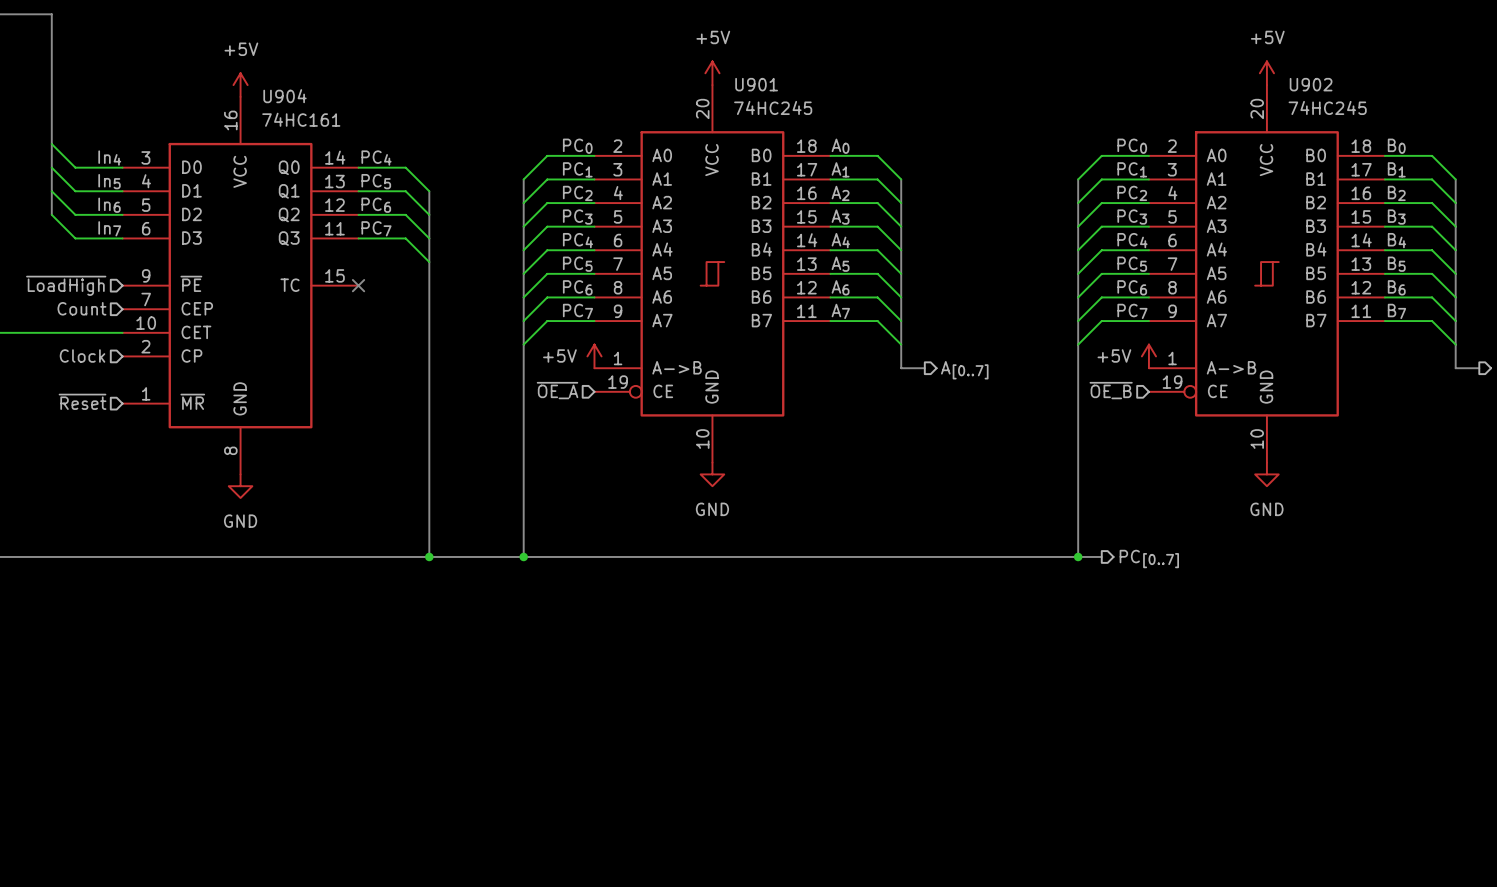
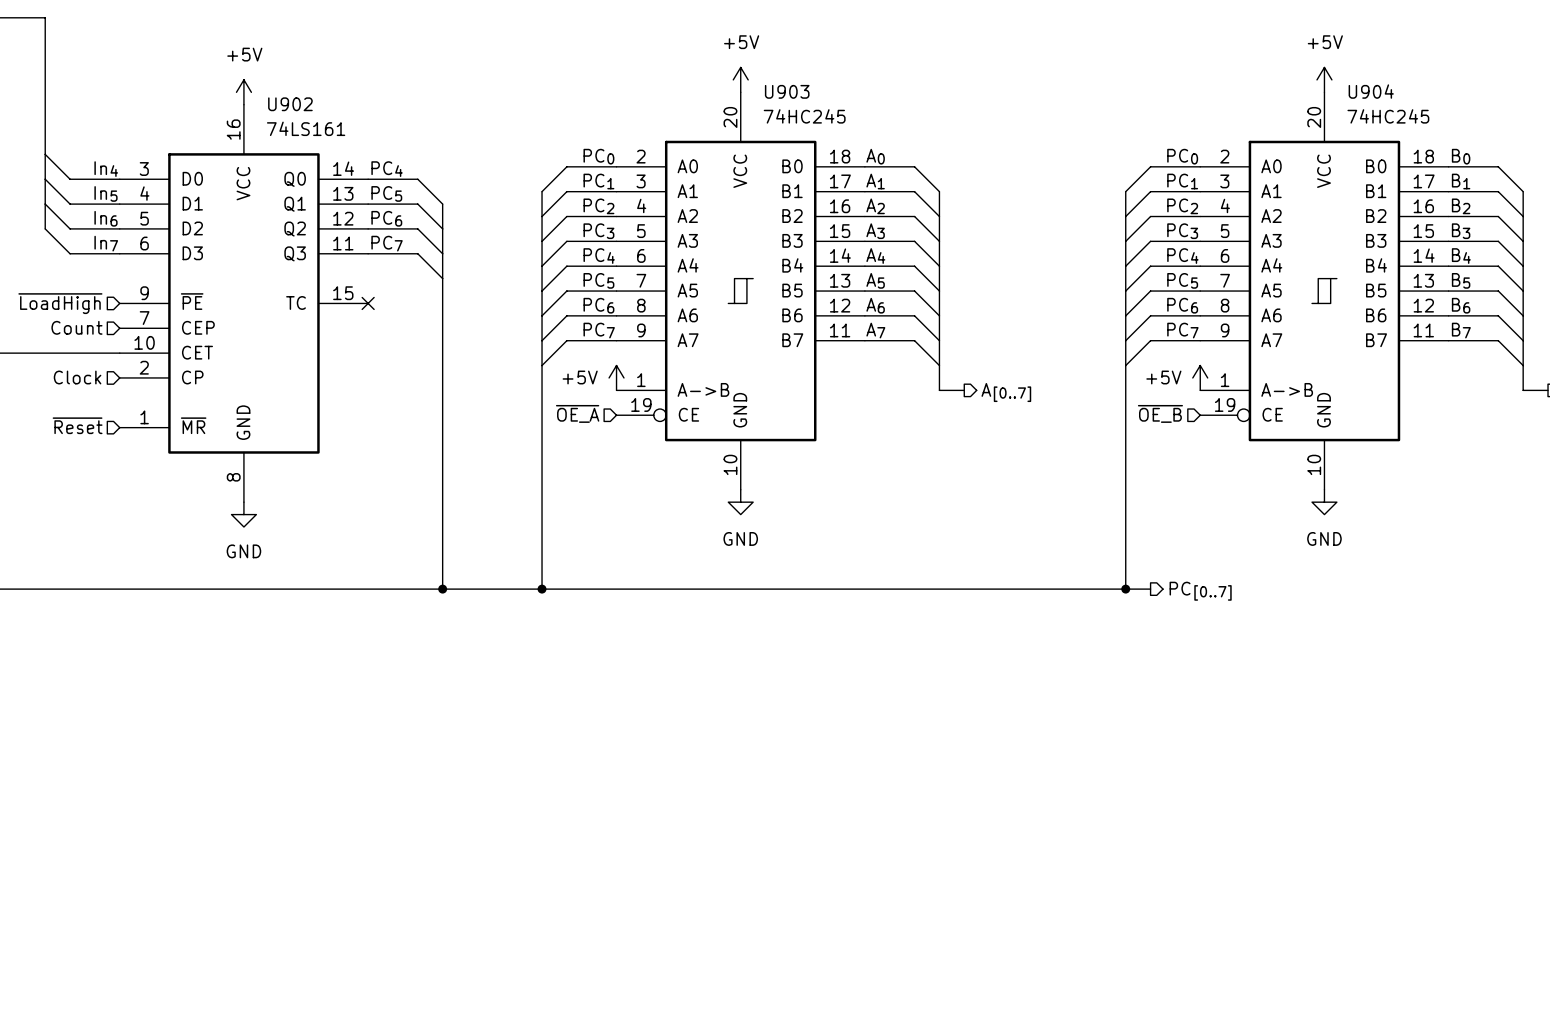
U901 name: U901 (756, 84) -> U903 (787, 91)
U902 name: U902 (1311, 84) -> U904 (1371, 91)
U904 name: U904 (284, 96) -> U902 (290, 104)
U904 value: 74HC161 (301, 119) -> 74LS161 (306, 128)

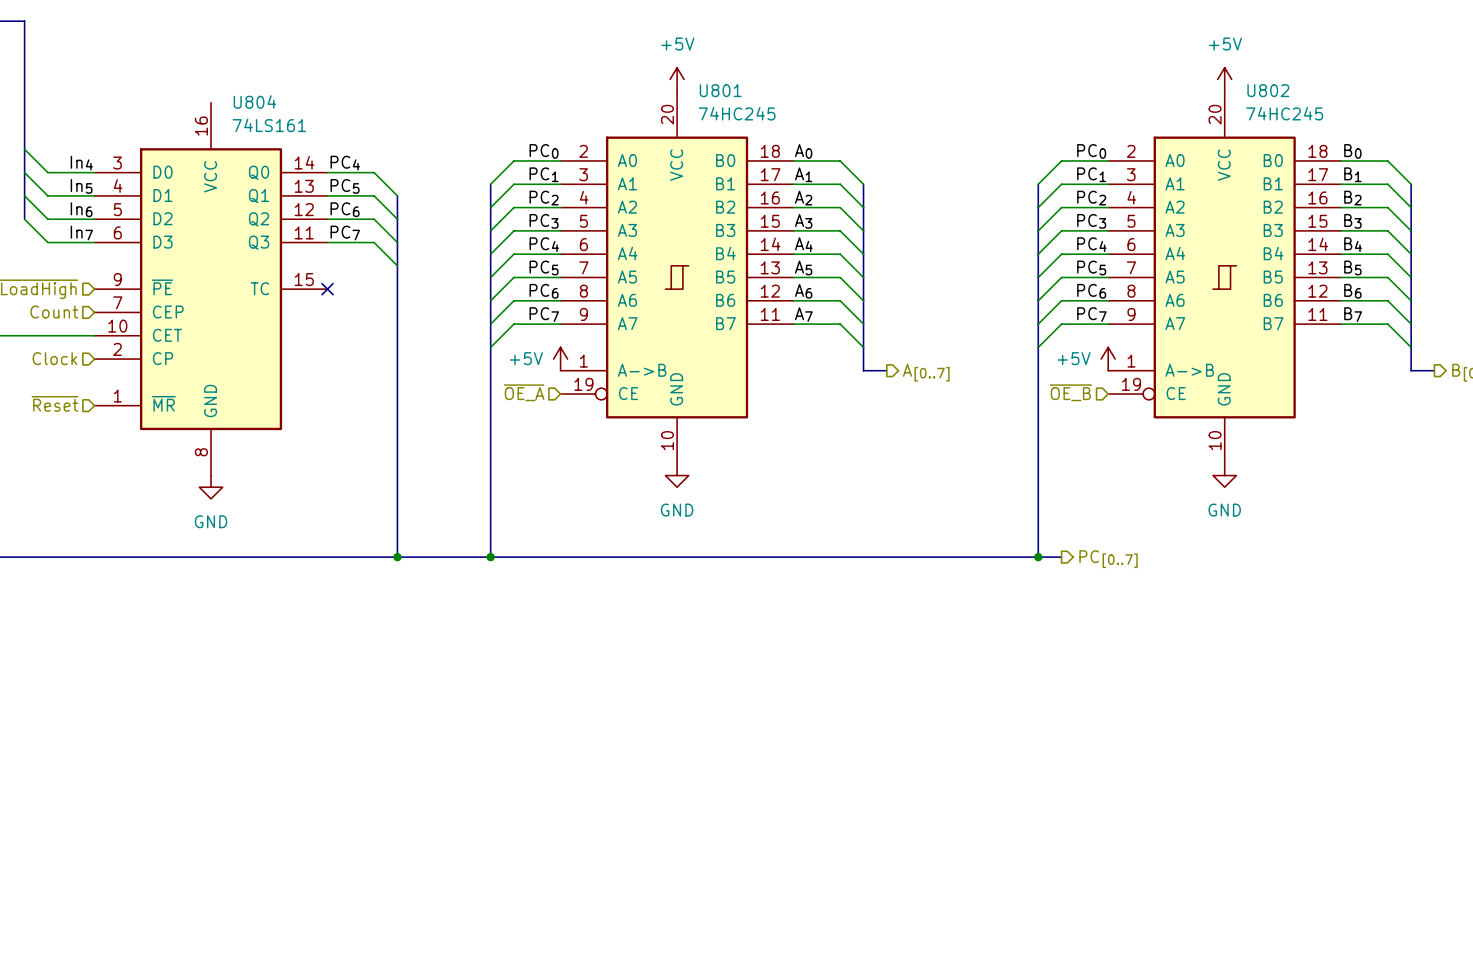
U903 name: U903 (787, 91) -> U801 (720, 90)
U904 name: U904 (1371, 91) -> U802 (1268, 90)
power symbol: +5V (243, 92) -> none
U902 name: U902 (290, 104) -> U804 (254, 102)

